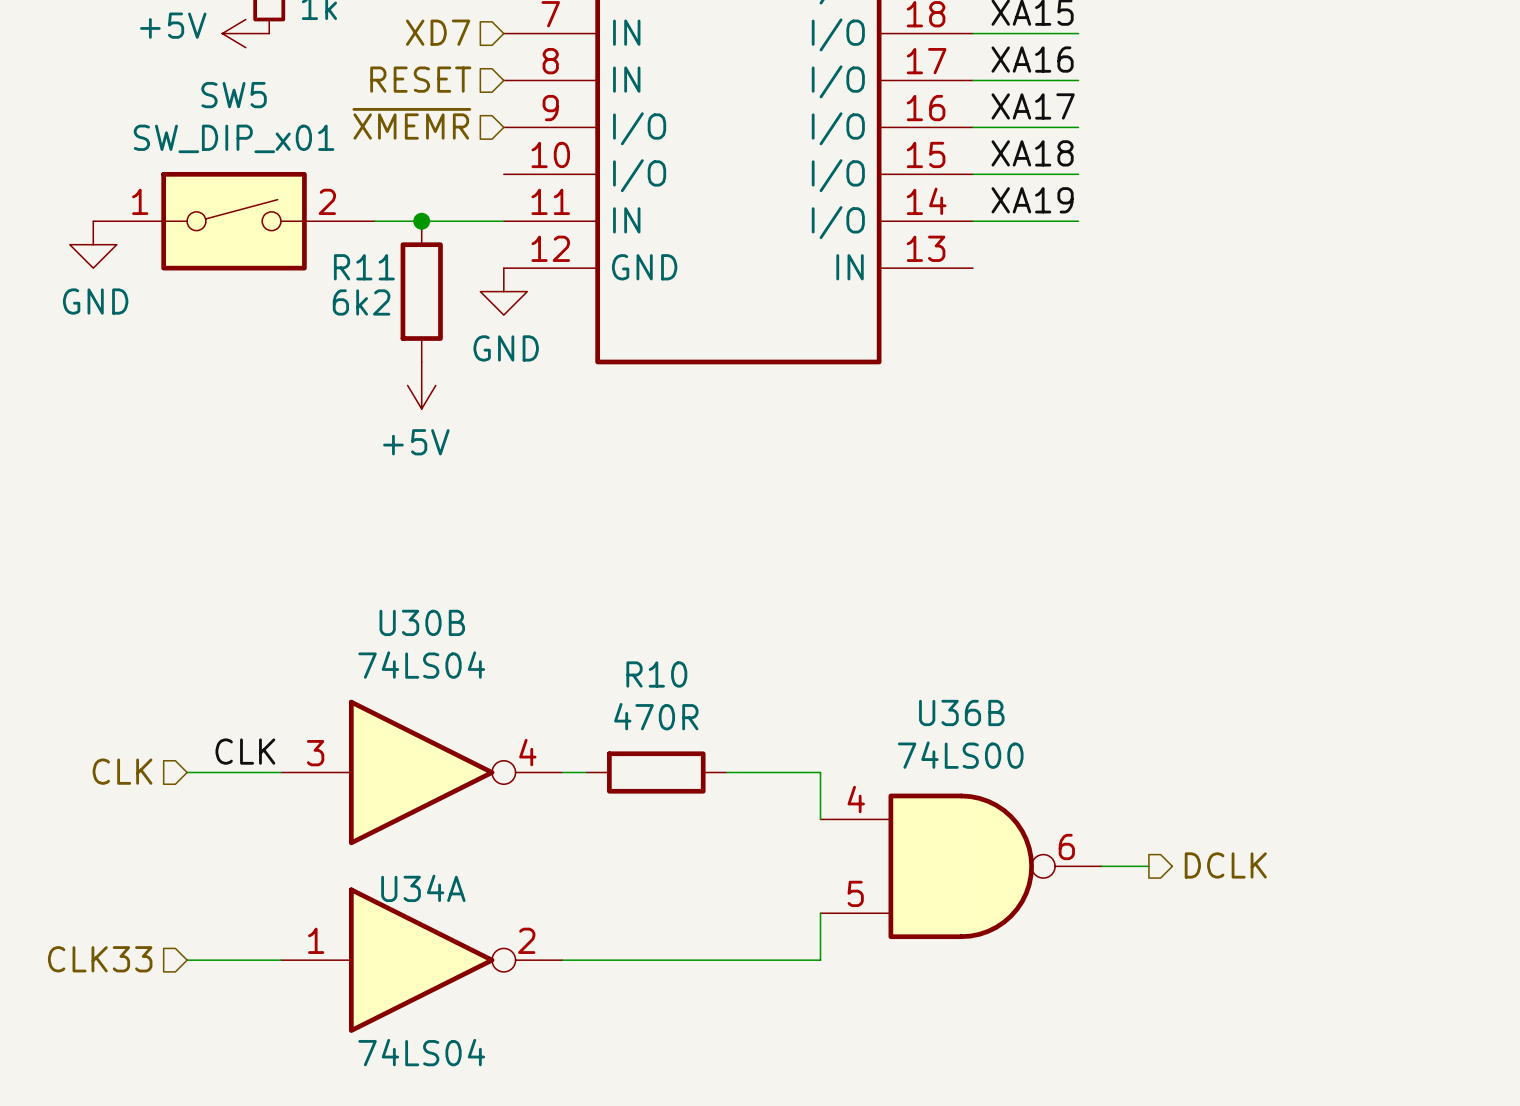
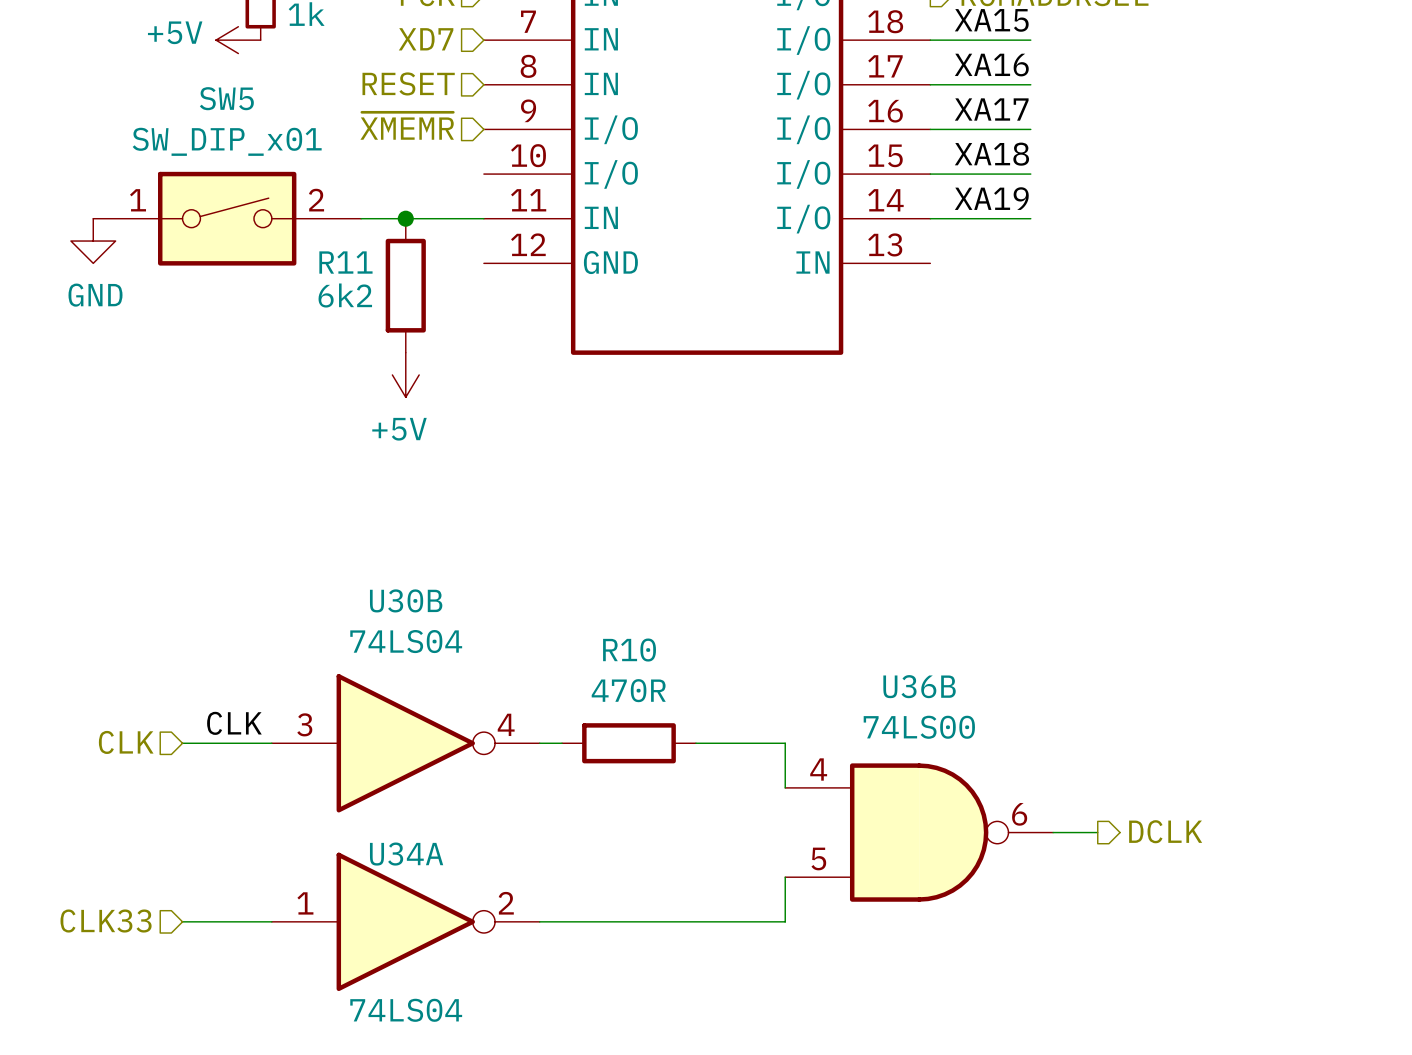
power symbol: GND (503, 291) -> none

